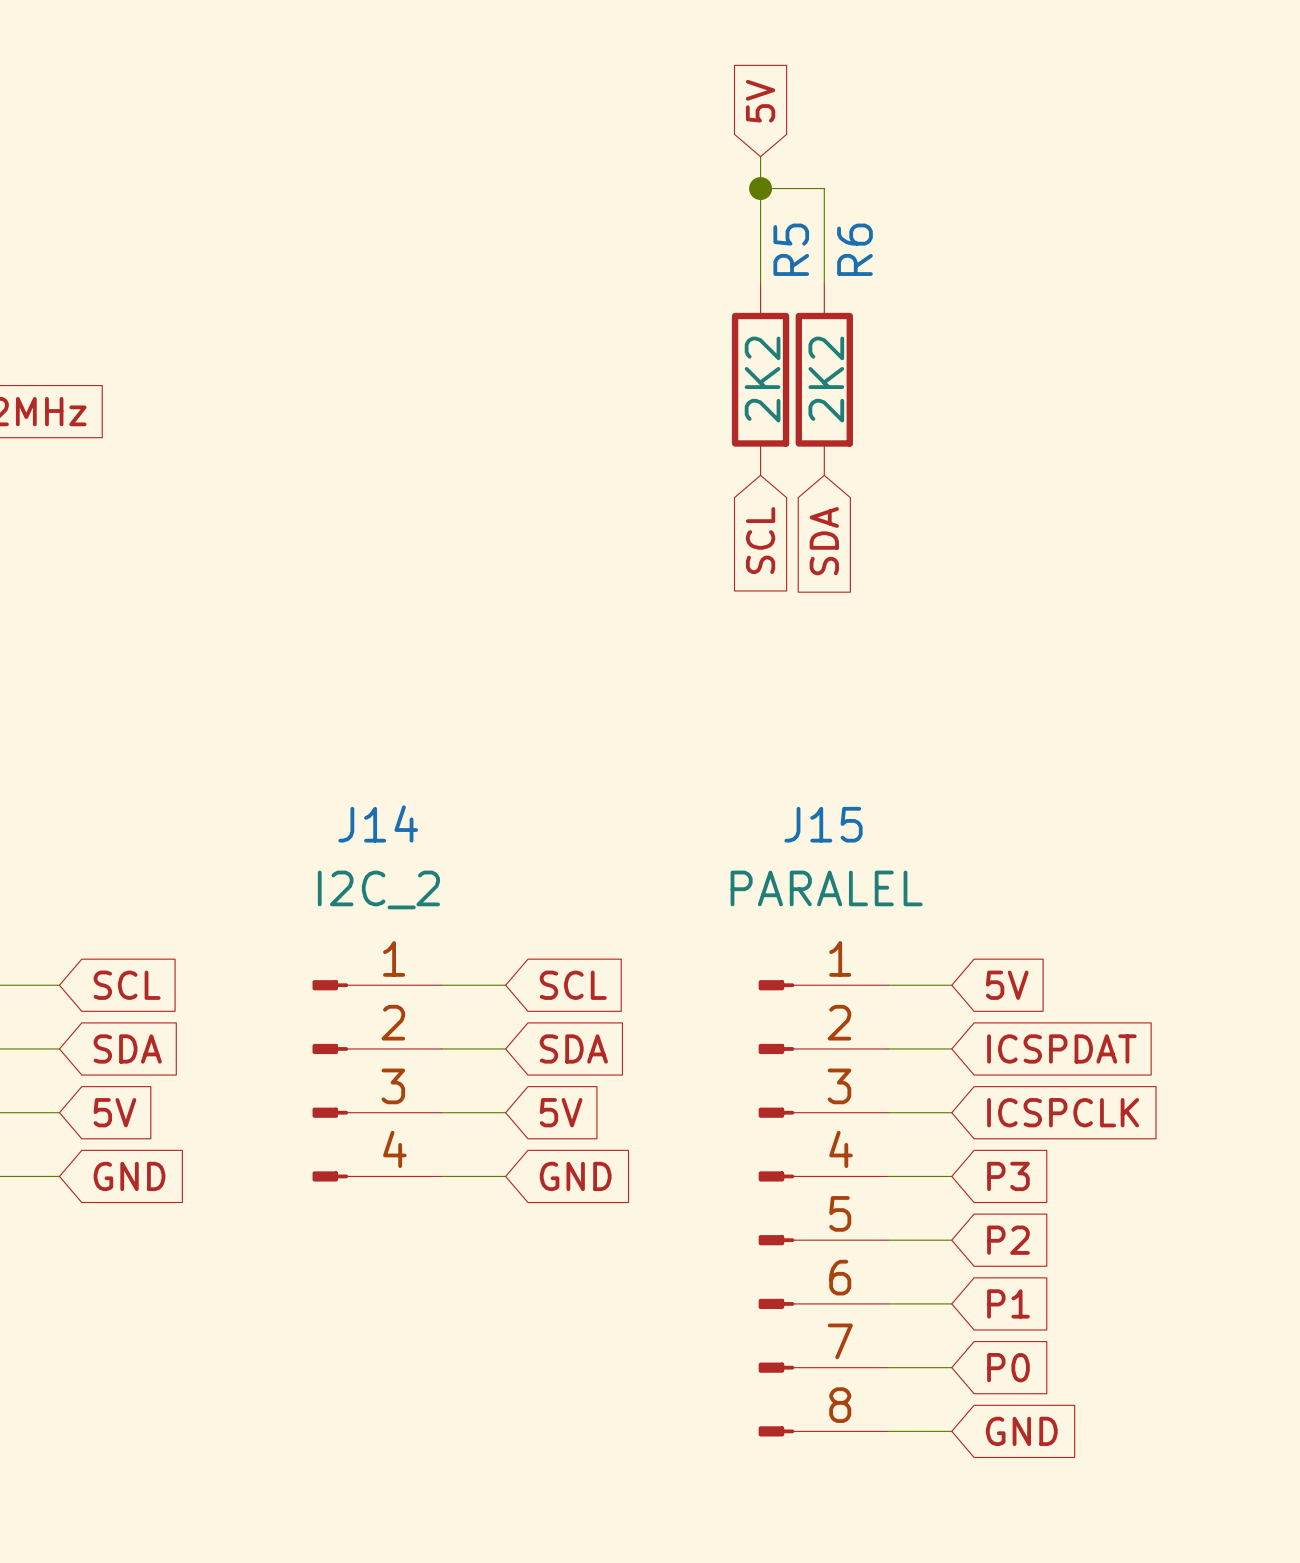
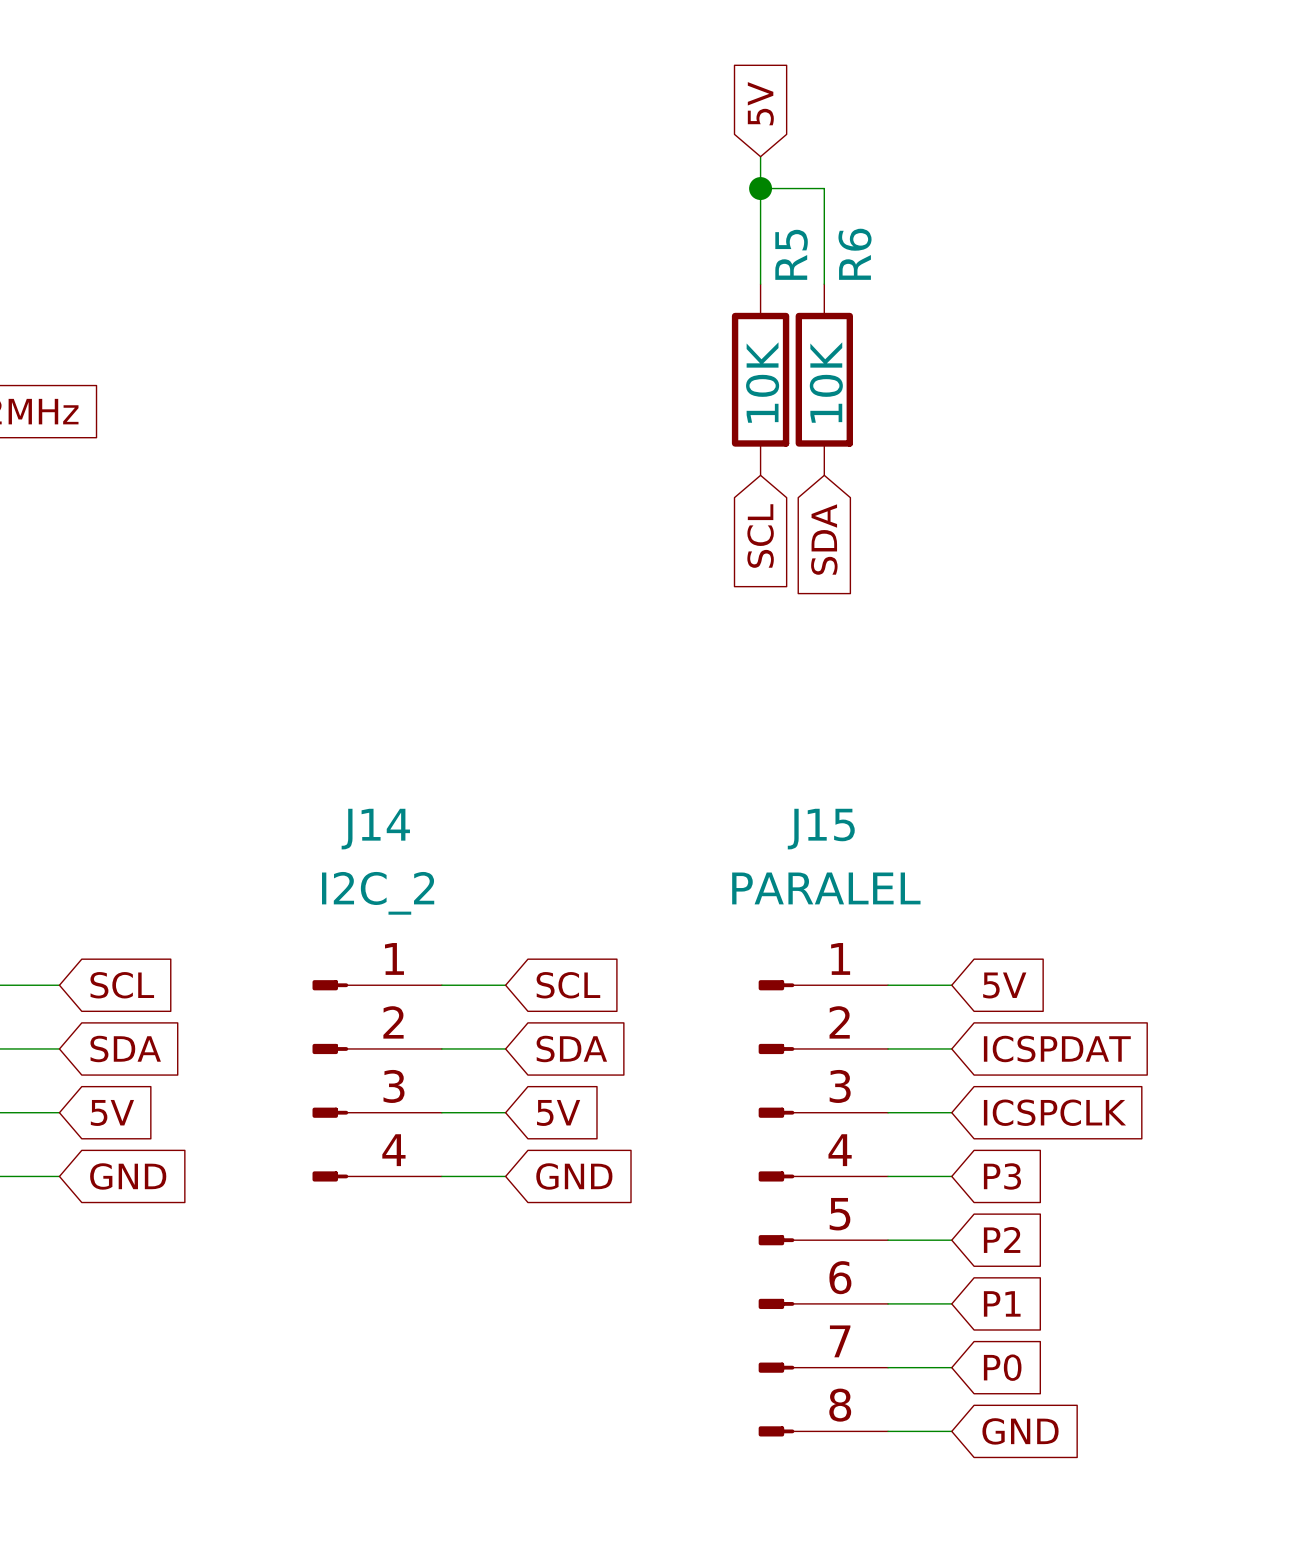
R5 value: 2K2 (762, 379) -> 10K (762, 382)
R6 value: 2K2 (826, 379) -> 10K (826, 382)

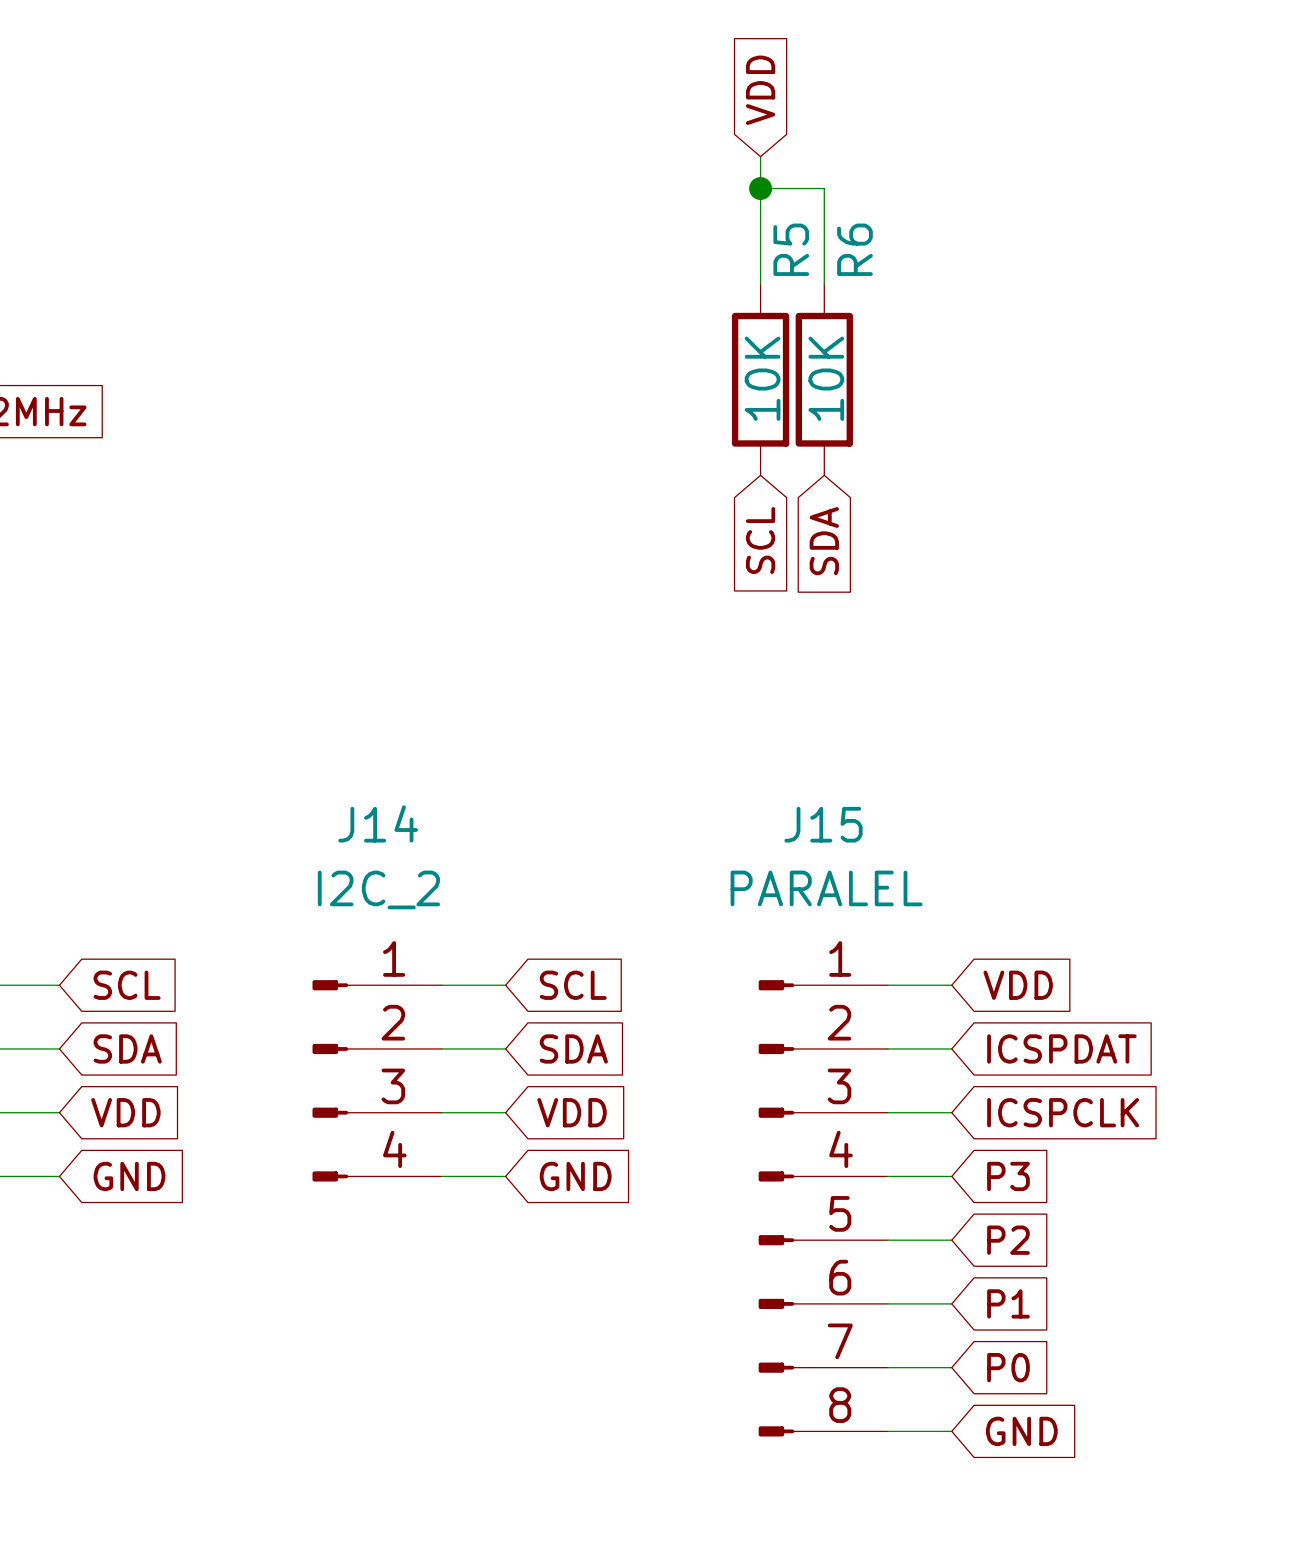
global label: 5V (760, 103) -> VDD (760, 90)
global label: 5V (1004, 985) -> VDD (1018, 985)
global label: 5V (112, 1112) -> VDD (125, 1112)
global label: 5V (558, 1112) -> VDD (572, 1112)

